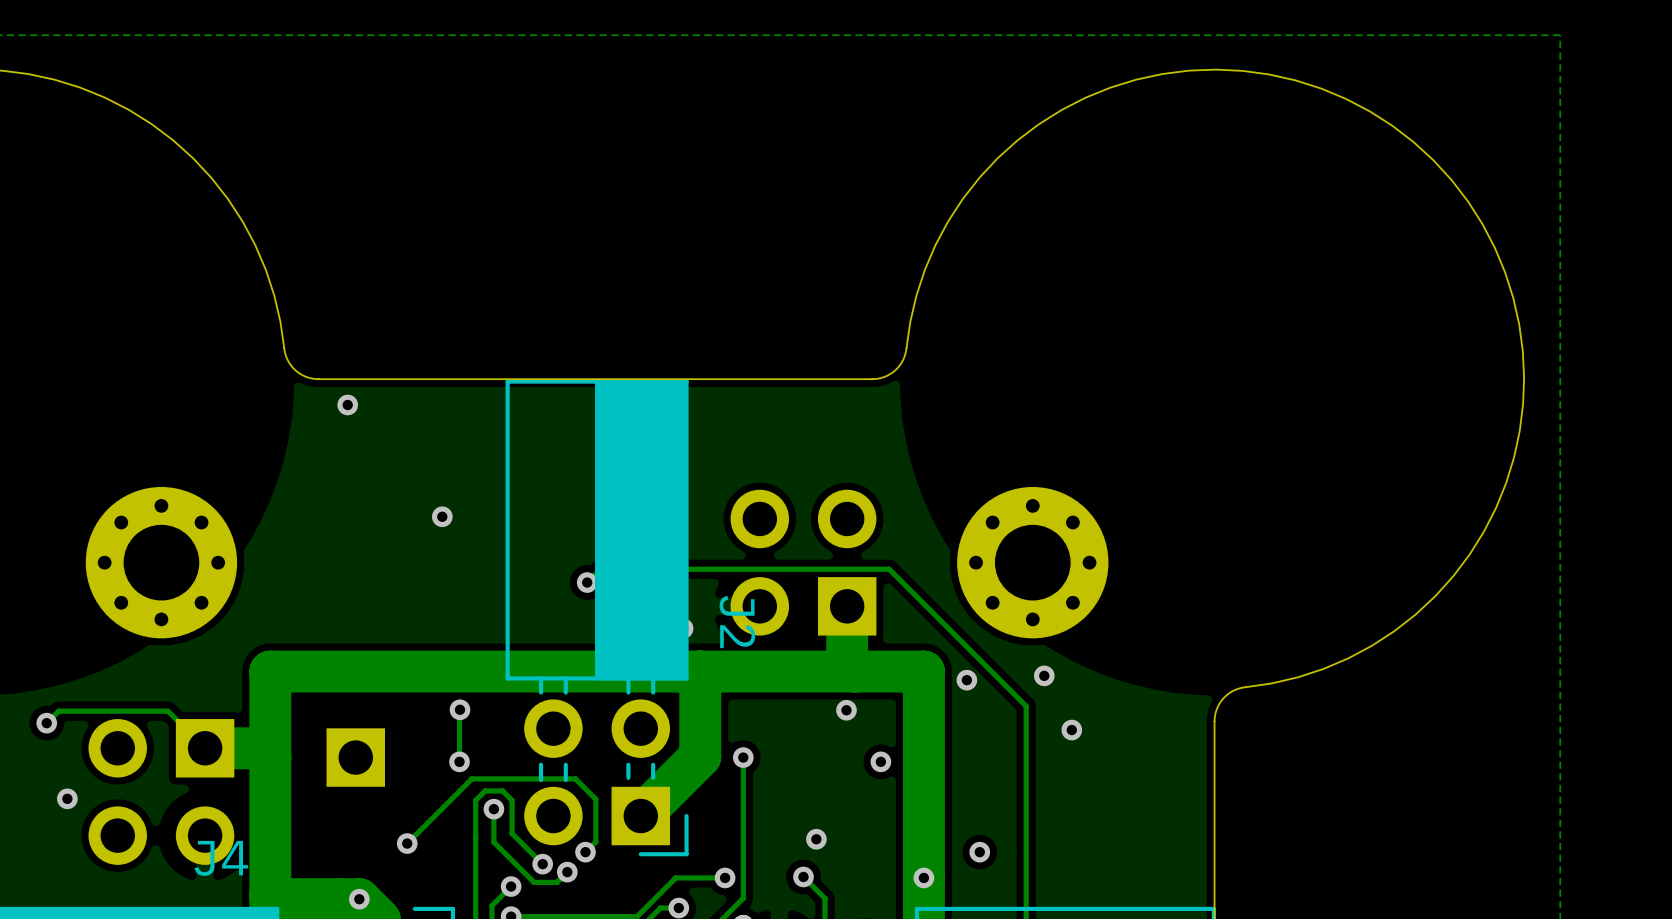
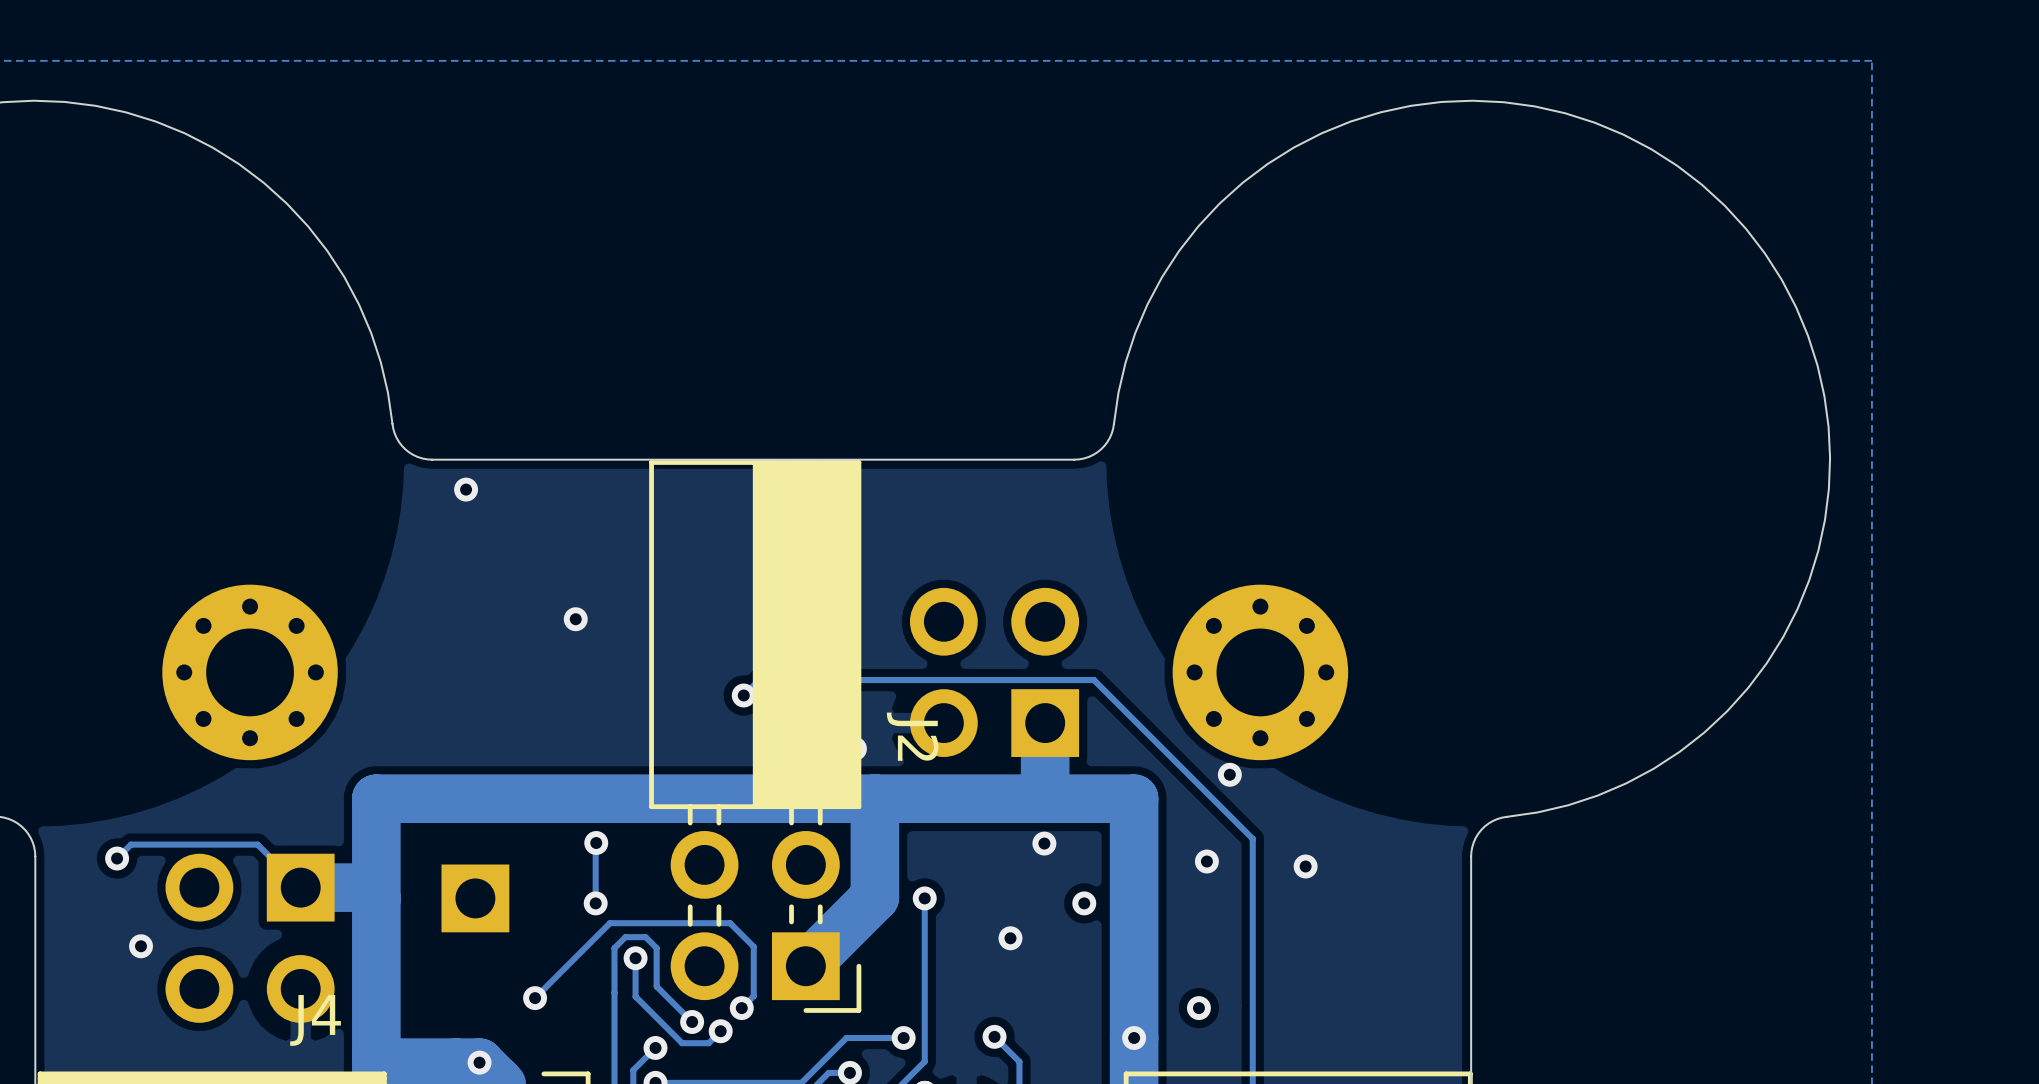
via: none -> (1229, 774)
via: (1044, 675) -> none
via: (966, 680) -> none
via: none -> (1206, 861)
via position: (816, 839) -> (1010, 938)

